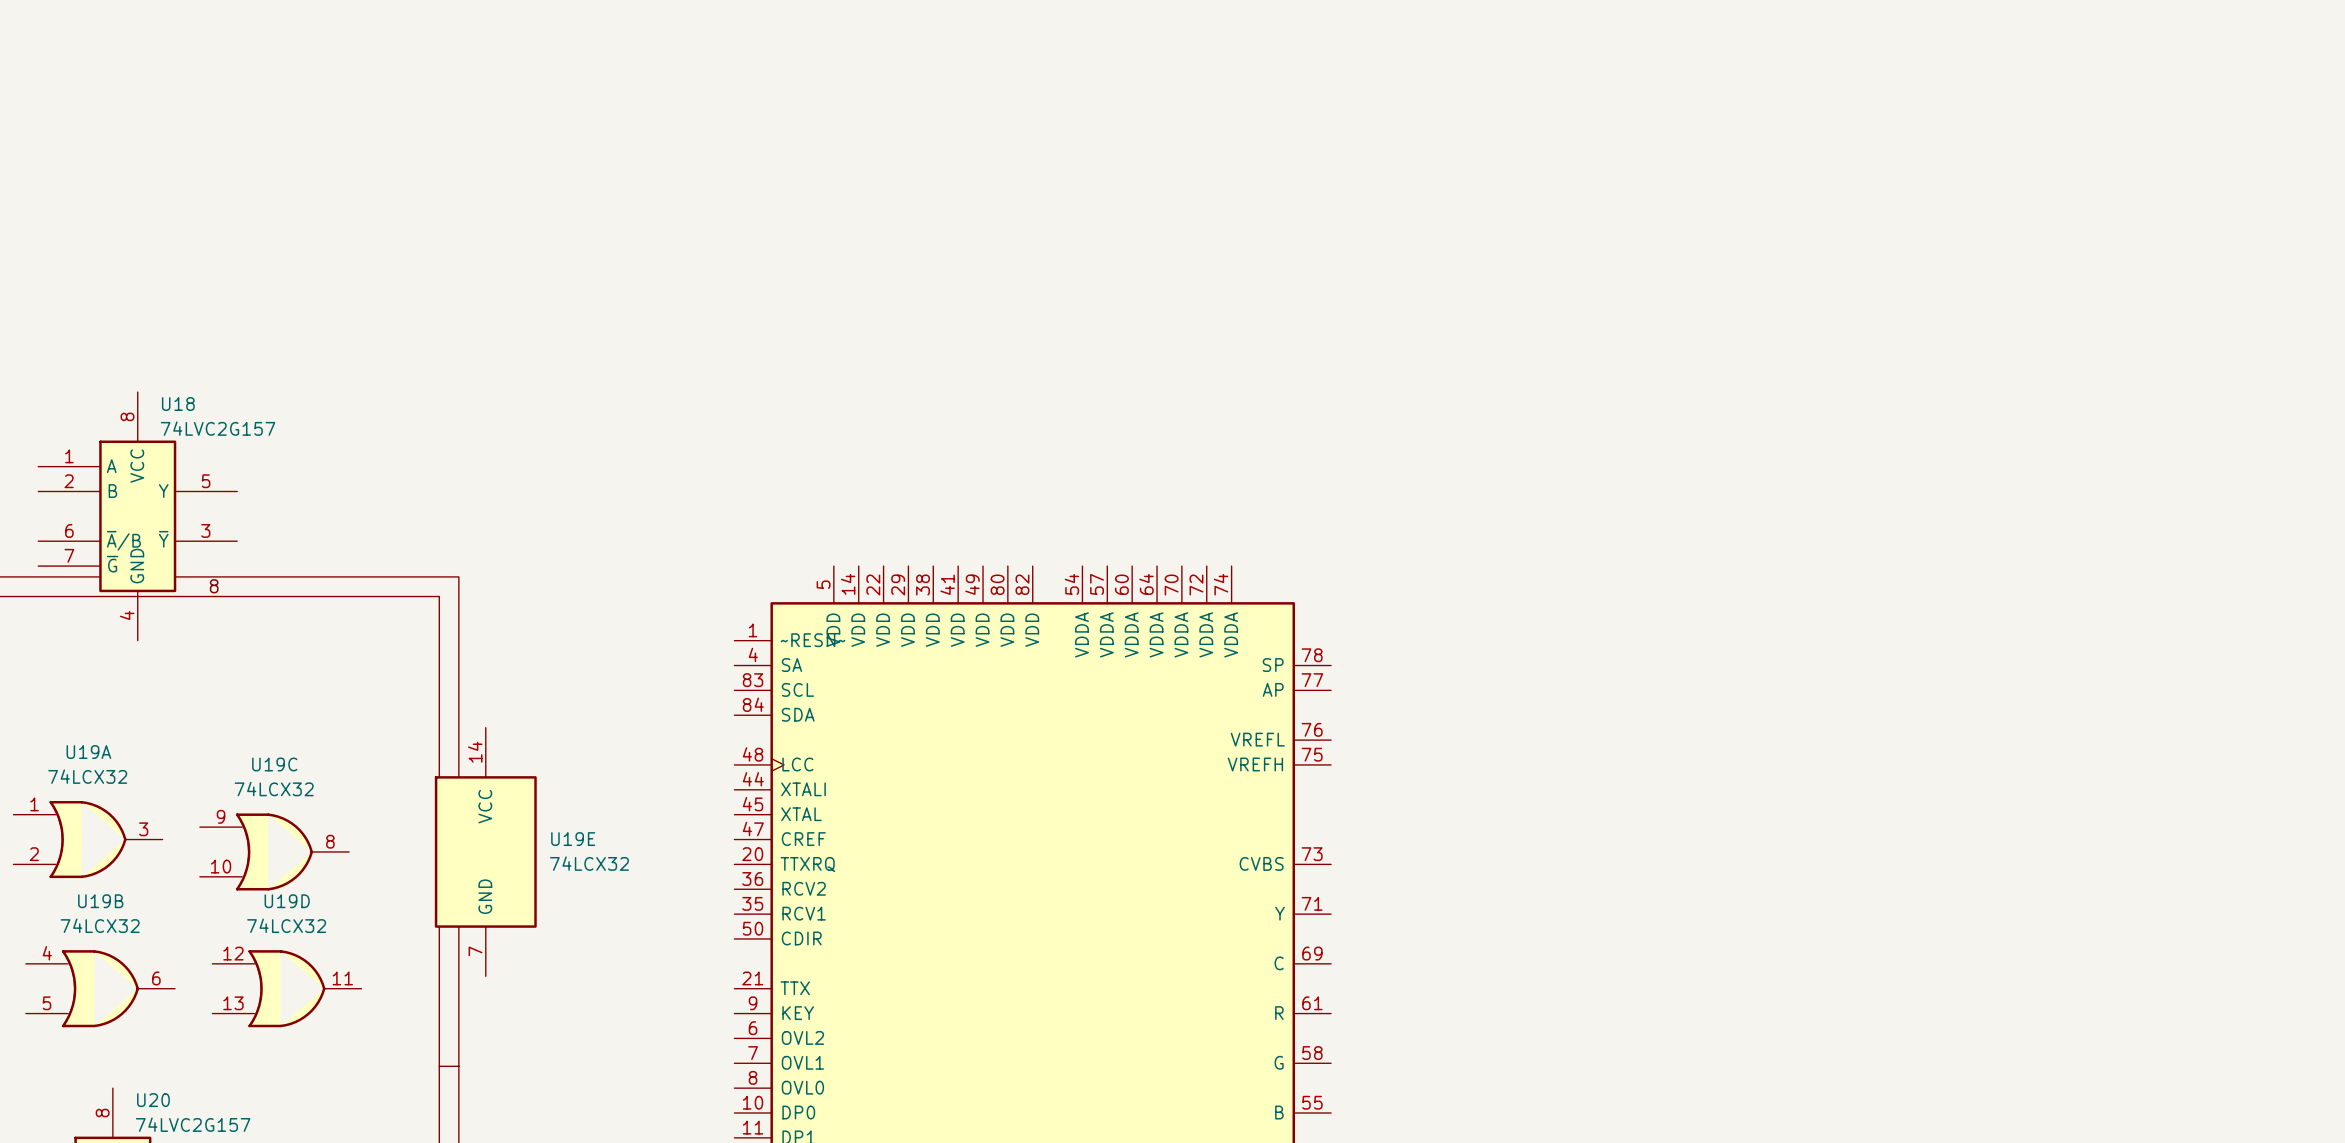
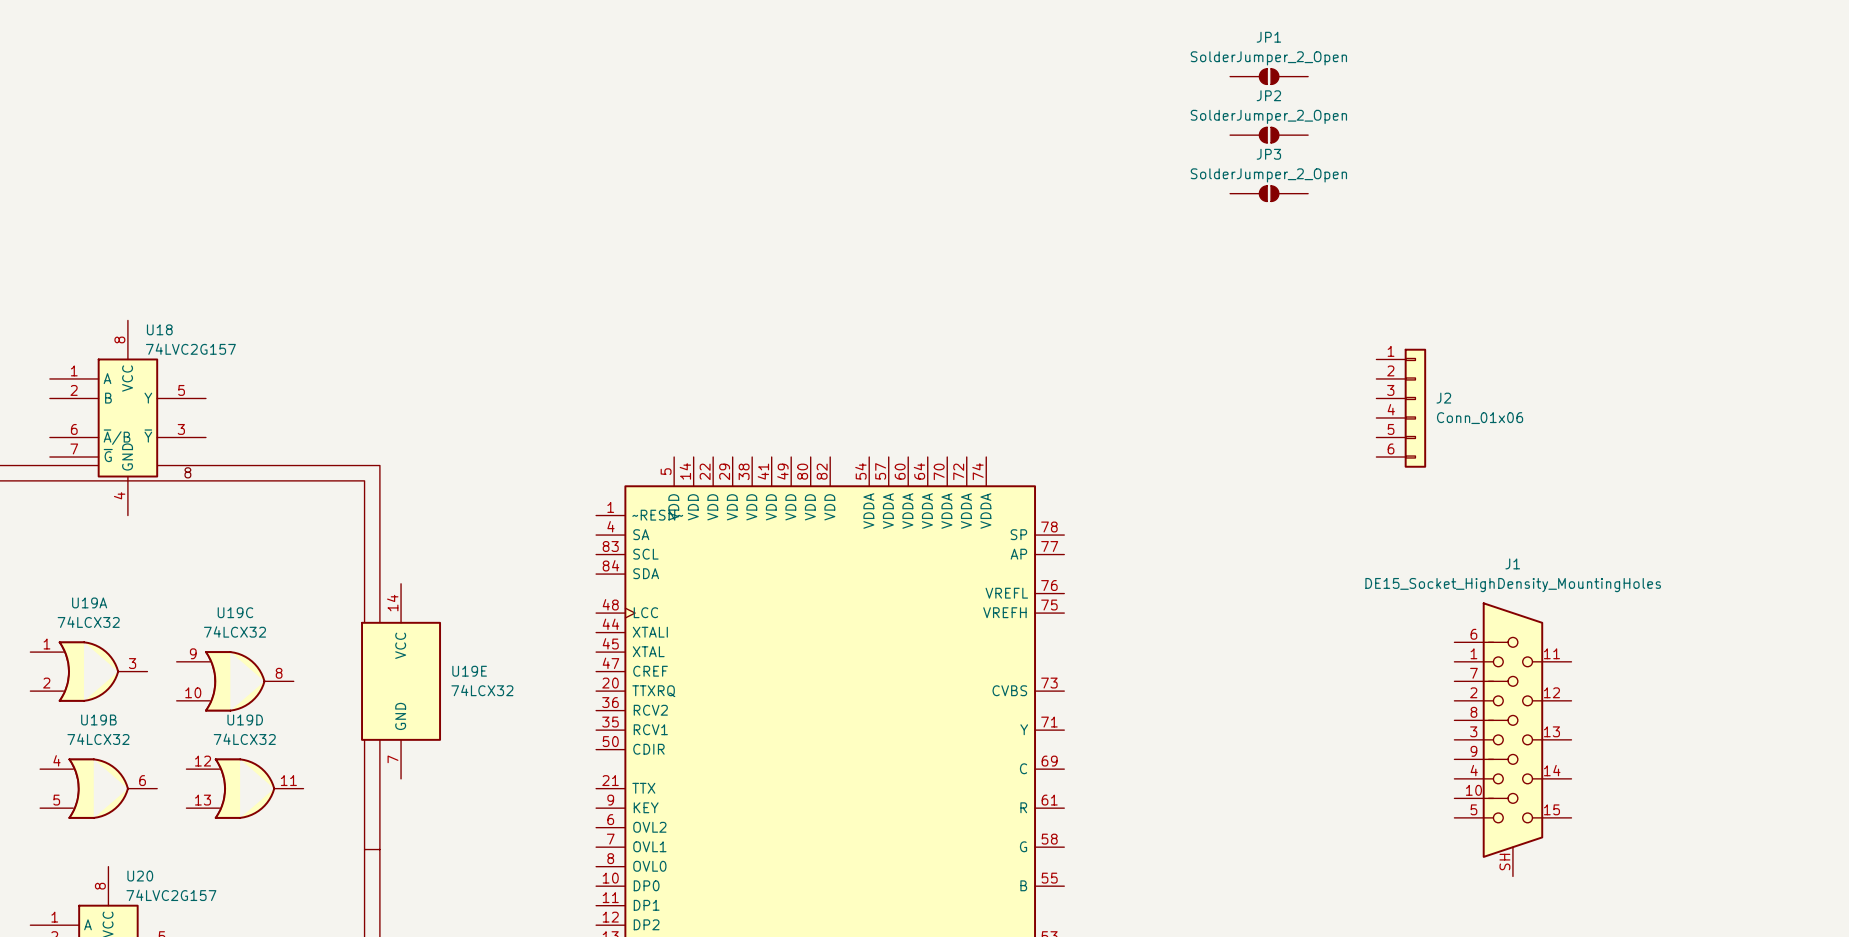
JP1: none -> SolderJumper_2_Open (1269, 76)
JP2: none -> SolderJumper_2_Open (1269, 135)
JP3: none -> SolderJumper_2_Open (1269, 193)
J2: none -> Conn_01x06 (1401, 408)
J1: none -> DE15_Socket_HighDensity_MountingHoles (1512, 739)

